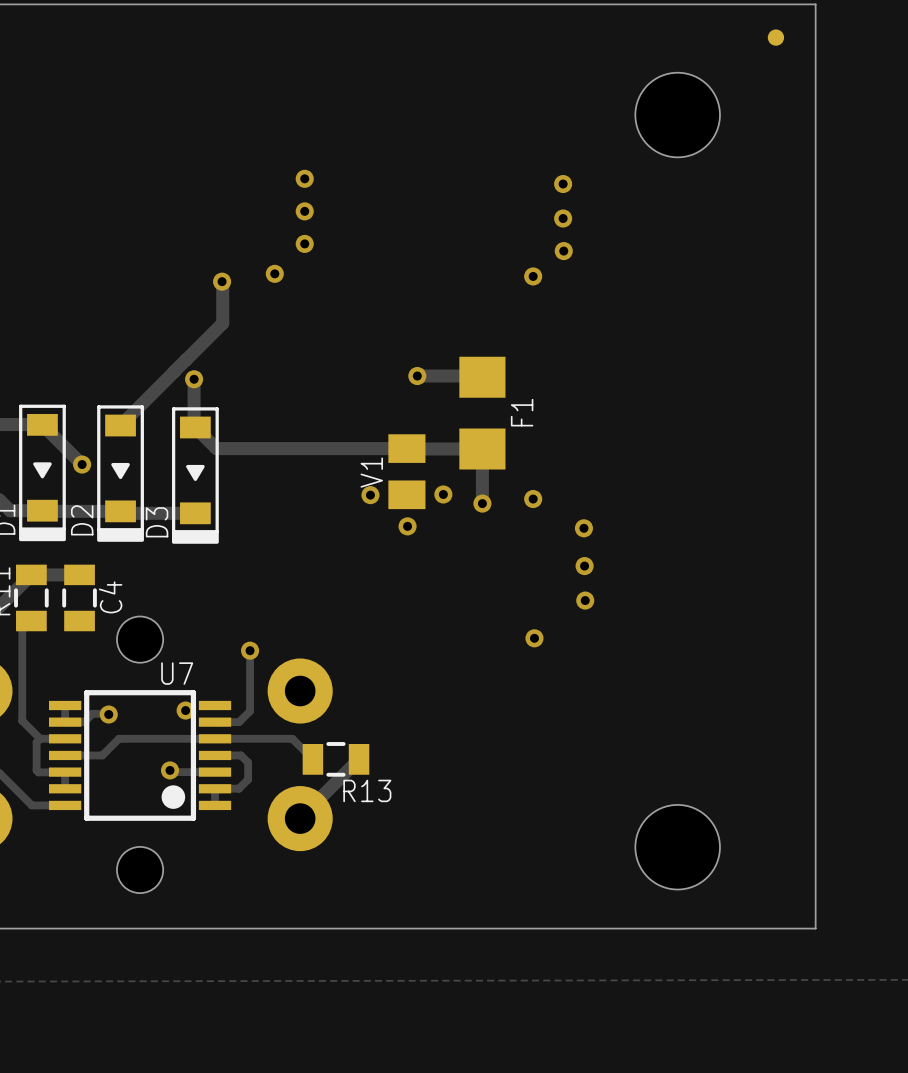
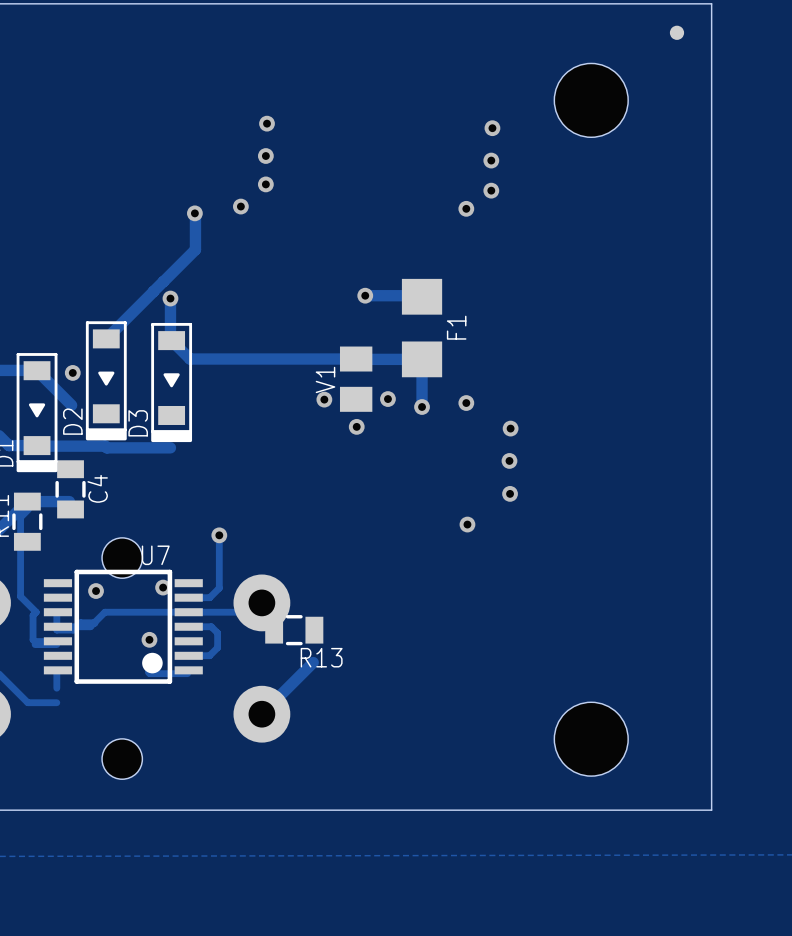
via: none -> (267, 123)
via: none -> (492, 128)
via: none -> (240, 206)
via: none -> (466, 208)
via: (304, 243) -> none
via: none -> (194, 213)
via: (563, 251) -> none
via: (274, 273) -> none
via: (533, 276) -> none
track: (222, 281) (222, 323) (120, 425) -> (194, 213) (195, 249) (106, 338)
via: (222, 281) -> none
via: none -> (170, 298)
track: (417, 376) (482, 377) -> (365, 295) (422, 296)
via position: (417, 376) -> (365, 295)
track: (194, 379) (194, 426) (216, 448) (482, 448) (482, 503) -> (170, 298) (170, 339) (190, 359) (422, 359) (422, 407)
via: (194, 379) -> none
F1 position: (482, 413) -> (422, 328)
via: none -> (387, 399)
via: none -> (324, 399)
via: none -> (466, 403)
via position: (82, 464) -> (72, 372)
via: none -> (422, 407)
V1 position: (406, 471) -> (356, 379)
D2 position: (120, 473) -> (106, 380)
D3 position: (195, 475) -> (171, 382)
via: none -> (356, 426)
via: none -> (510, 428)
via: (443, 494) -> none
via: (370, 495) -> none
via: (533, 499) -> none
via: (482, 503) -> none
via: (407, 526) -> none
C4 position: (79, 597) -> (70, 489)
via: (585, 600) -> none
via: none -> (467, 524)
via: none -> (219, 535)
track: (31, 621) (22, 630) (22, 720) (40, 738) (36, 742) (36, 770) (38, 772) (64, 772) -> (28, 509) (20, 517) (20, 596) (36, 612) (33, 615) (33, 639) (34, 641) (57, 641)
via: (534, 638) -> none
track: (250, 650) (250, 711) (239, 722) (215, 722) -> (219, 535) (219, 588) (209, 597) (188, 597)
via: (250, 650) -> none
via: none -> (163, 587)
via: none -> (96, 591)
via: (185, 710) -> none
via: (108, 714) -> none
track: none -> (188, 626) (211, 626) (217, 633) (217, 647) (209, 655) (188, 655)
via: none -> (149, 639)
track: (65, 755) (102, 755) (118, 738) (292, 738) (312, 759) -> (57, 626) (90, 626) (104, 612) (256, 612) (274, 630)
U7 position: (140, 755) -> (123, 626)
track: (215, 755) (240, 755) (248, 762) (248, 779) (239, 788) (215, 788) (215, 805) -> none
R13 position: (335, 759) -> (294, 630)
via: (170, 770) -> none

